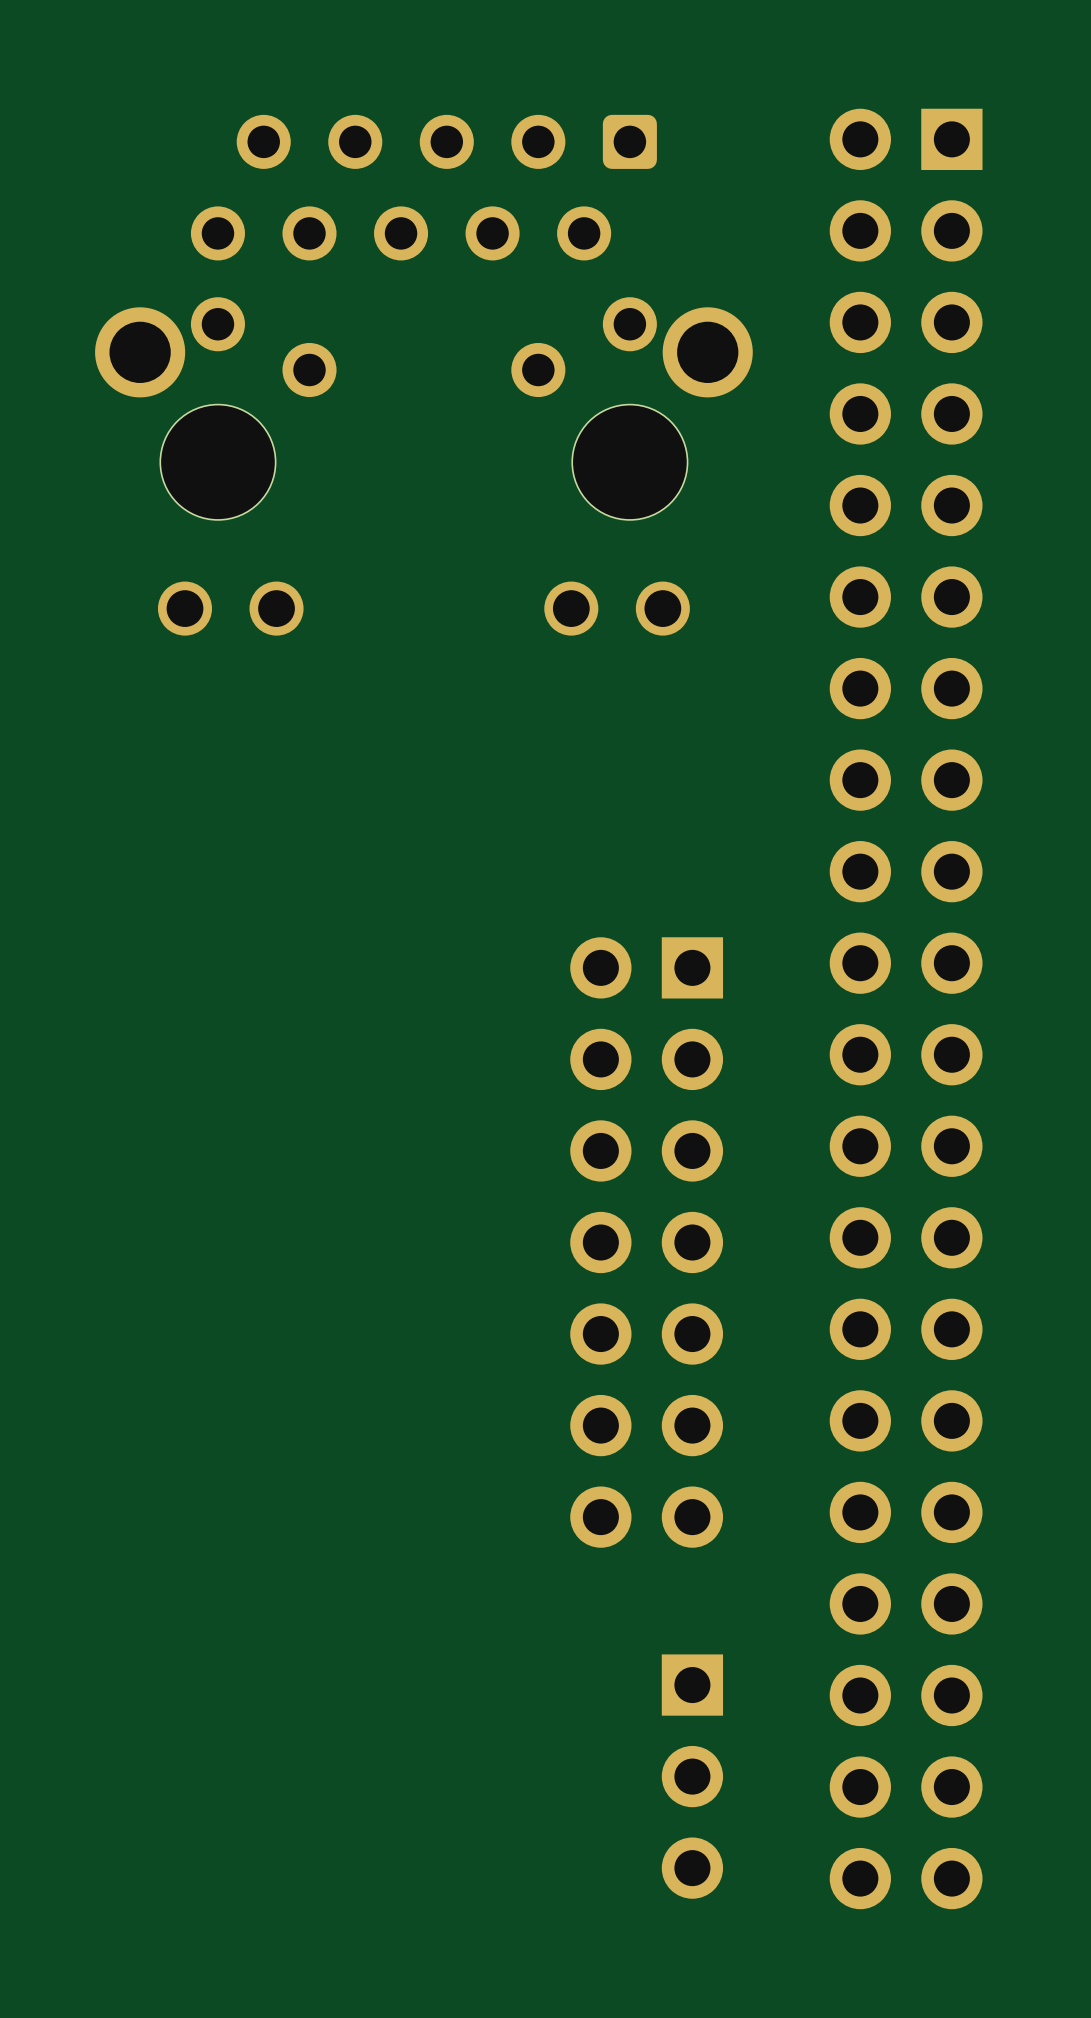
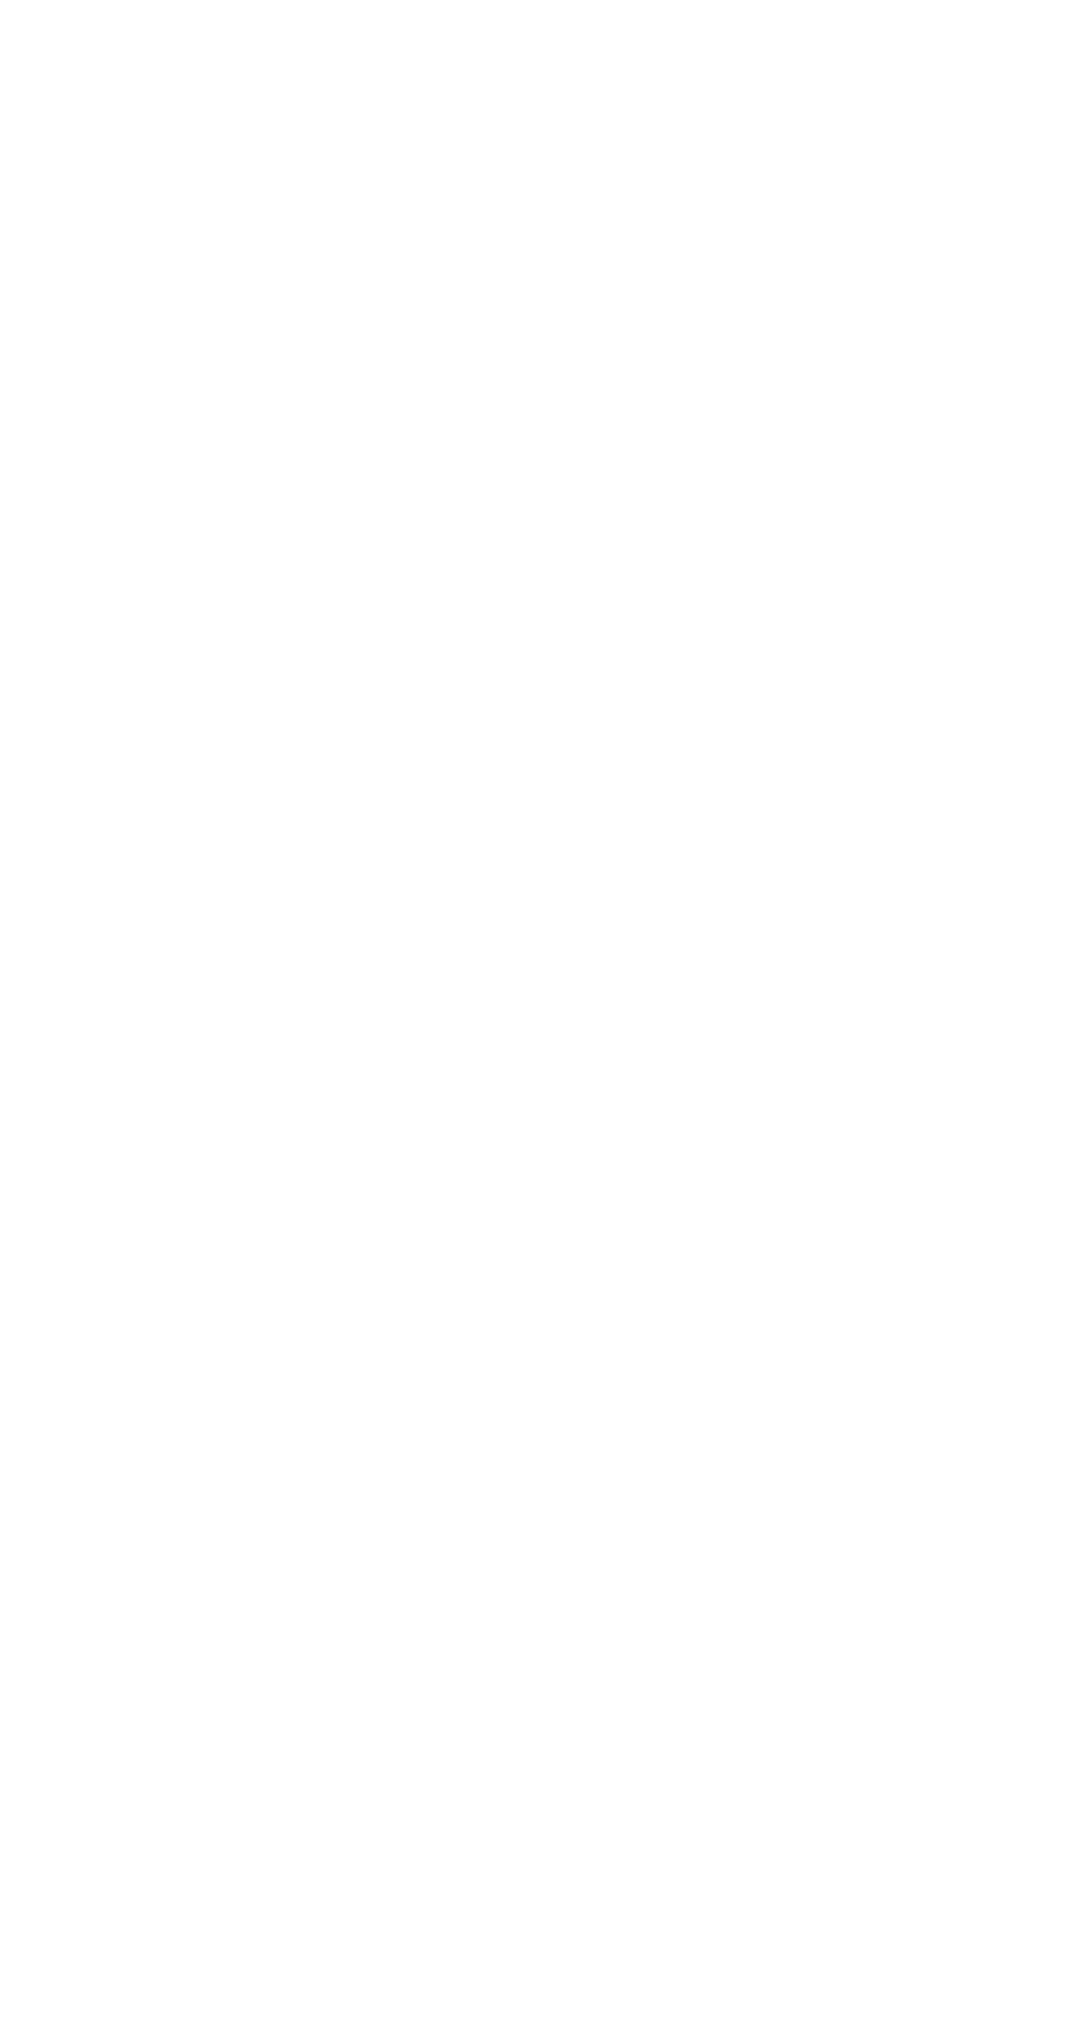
part: (423, 375) -> none
part: (906, 1008) -> none
part: (646, 1242) -> none
part: (692, 1776) -> none

